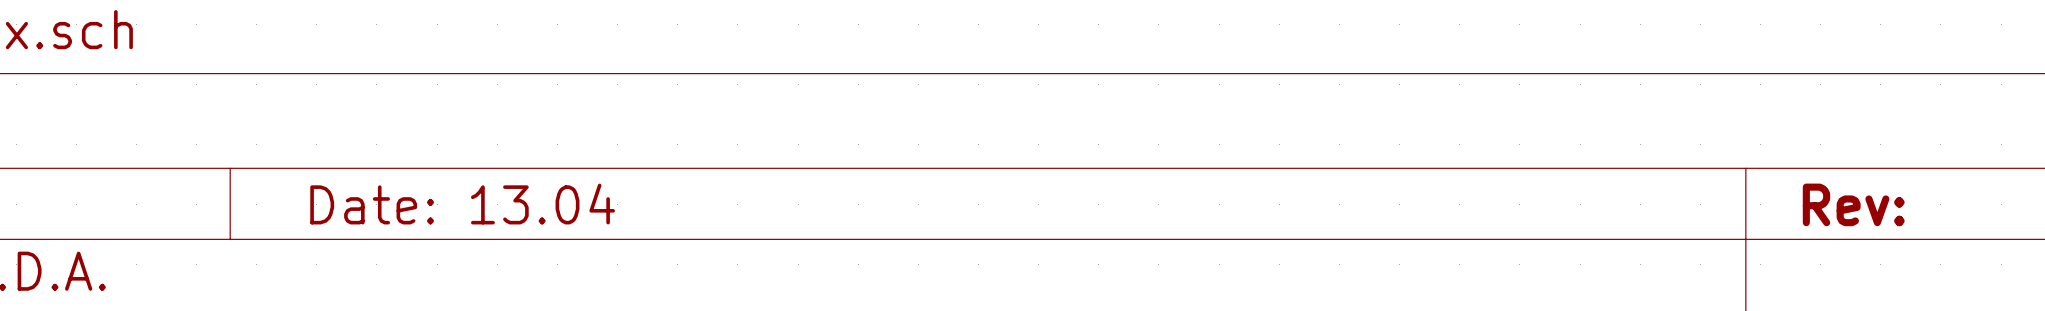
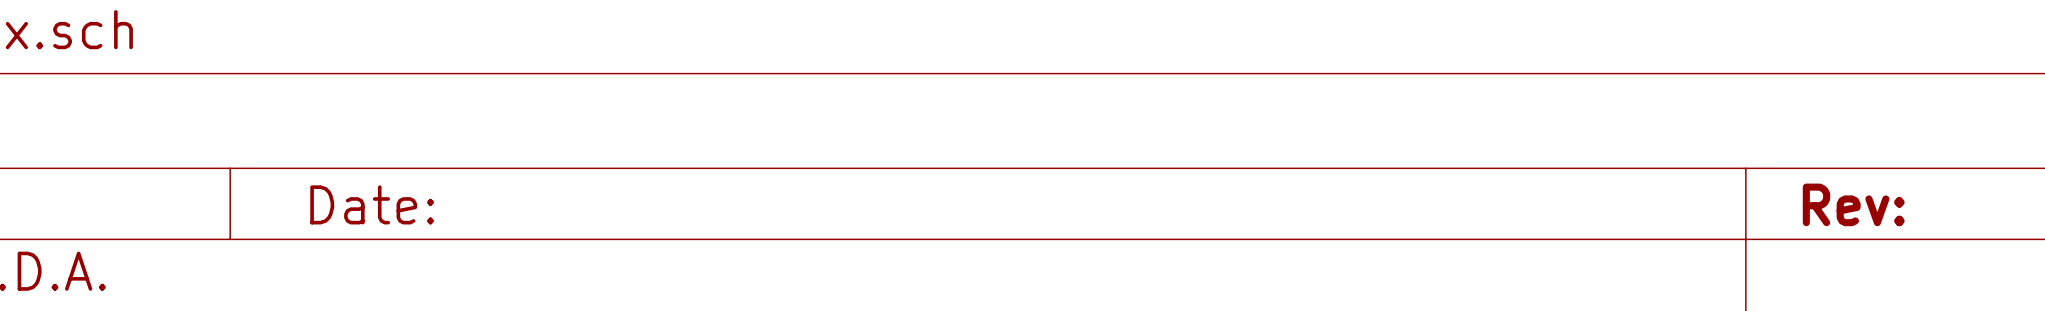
title block: Date: 13.04 (462, 204) -> Date: (372, 204)

